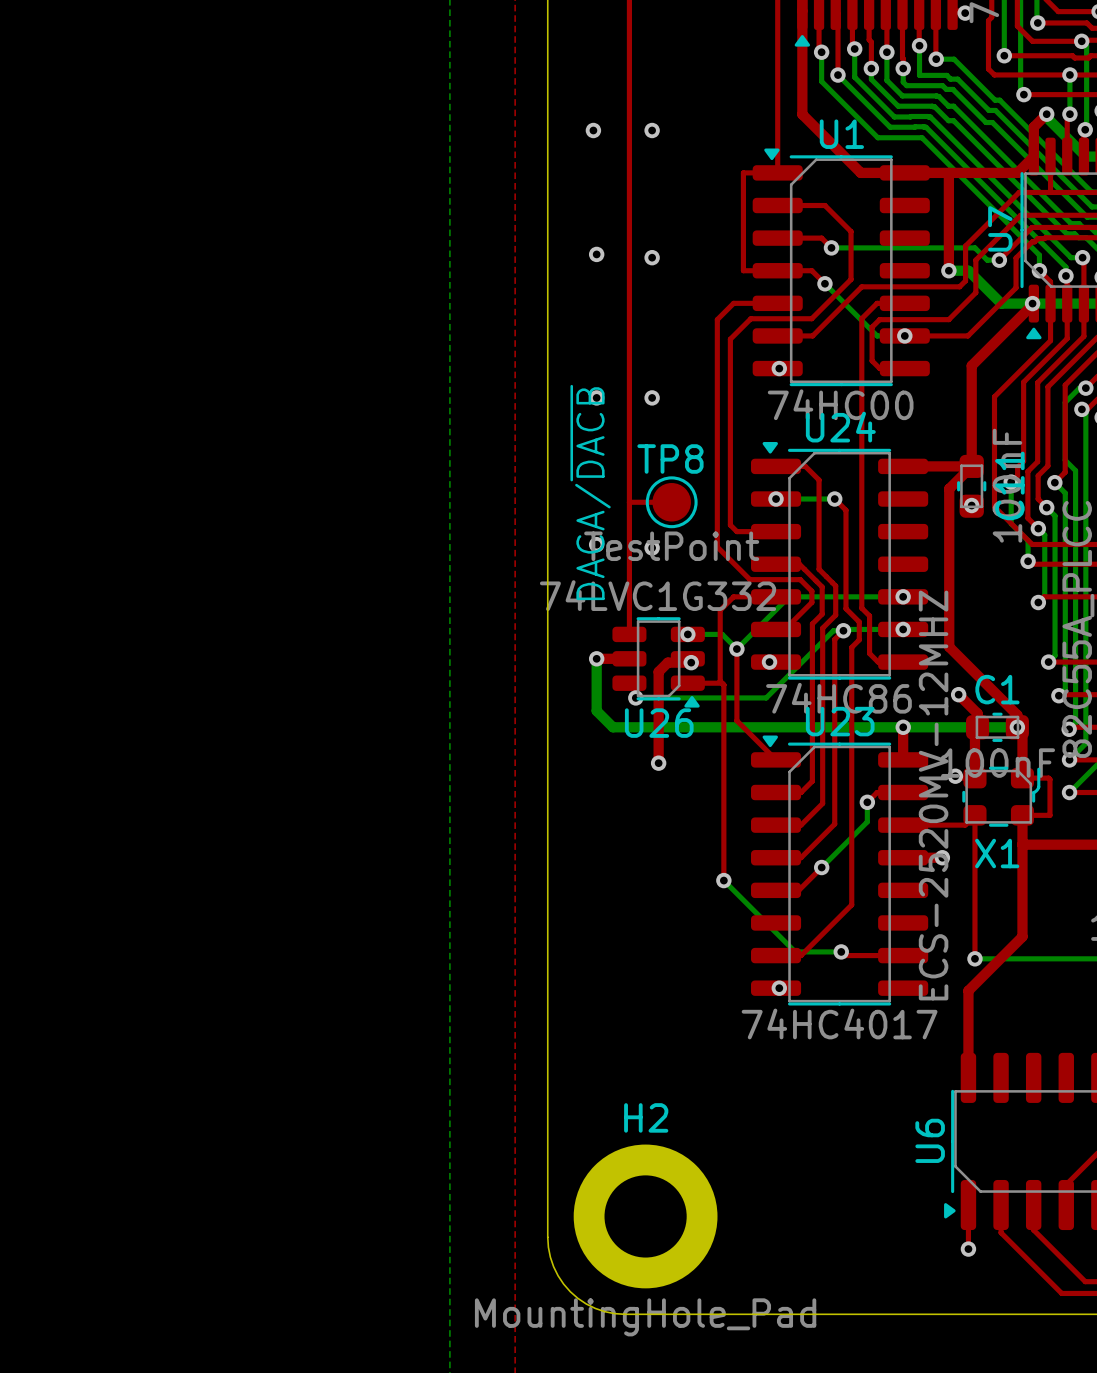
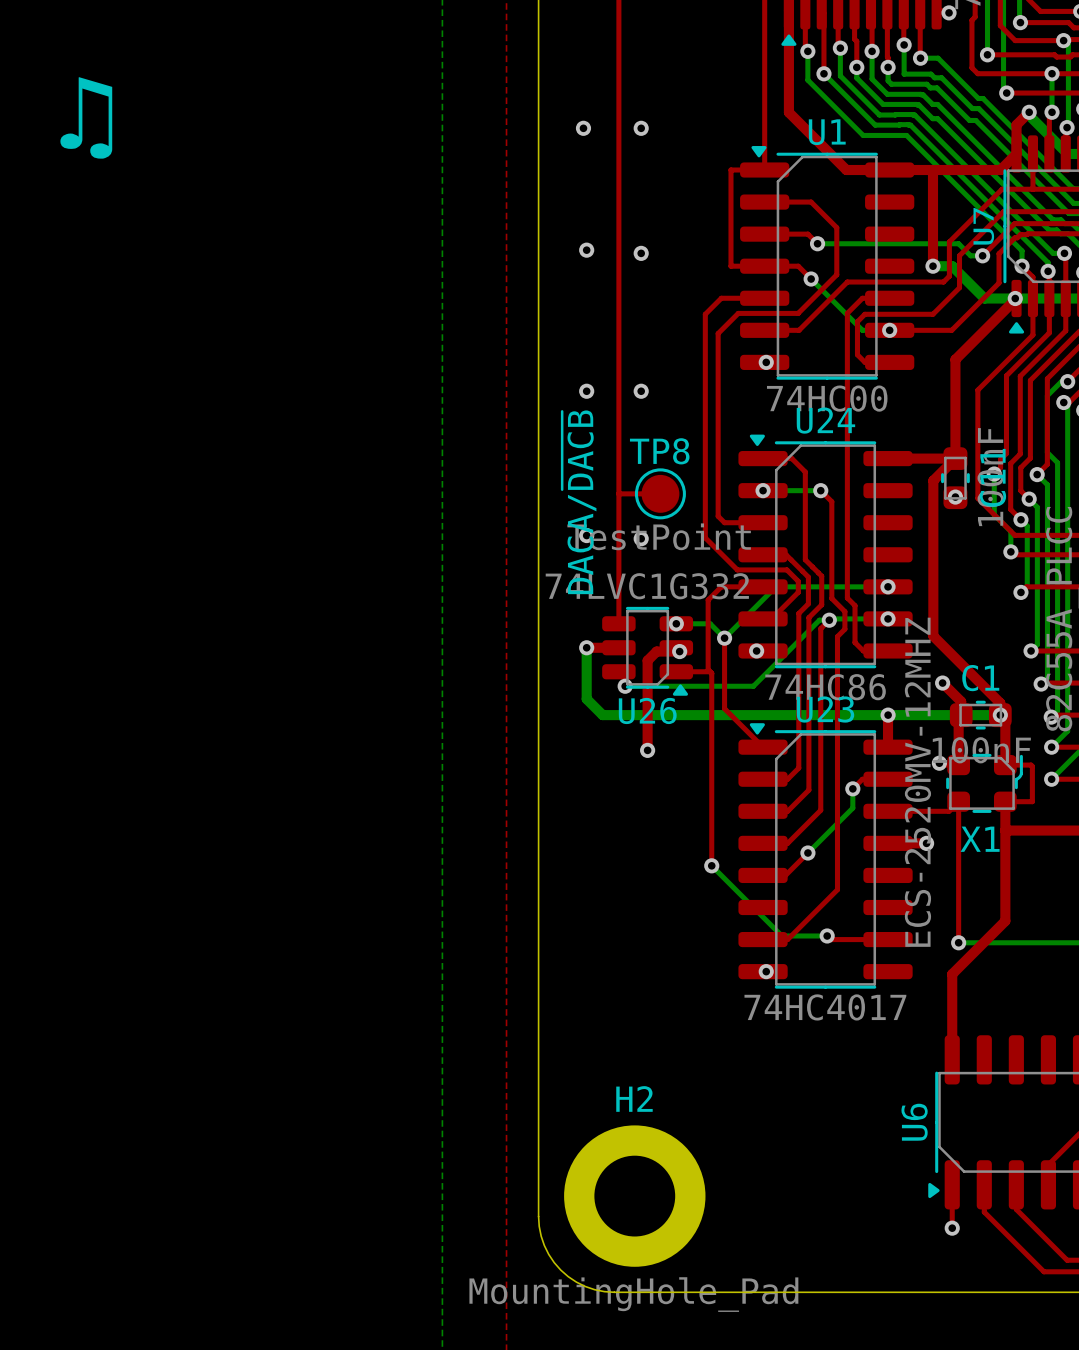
text: none -> ♫ (86, 117)

